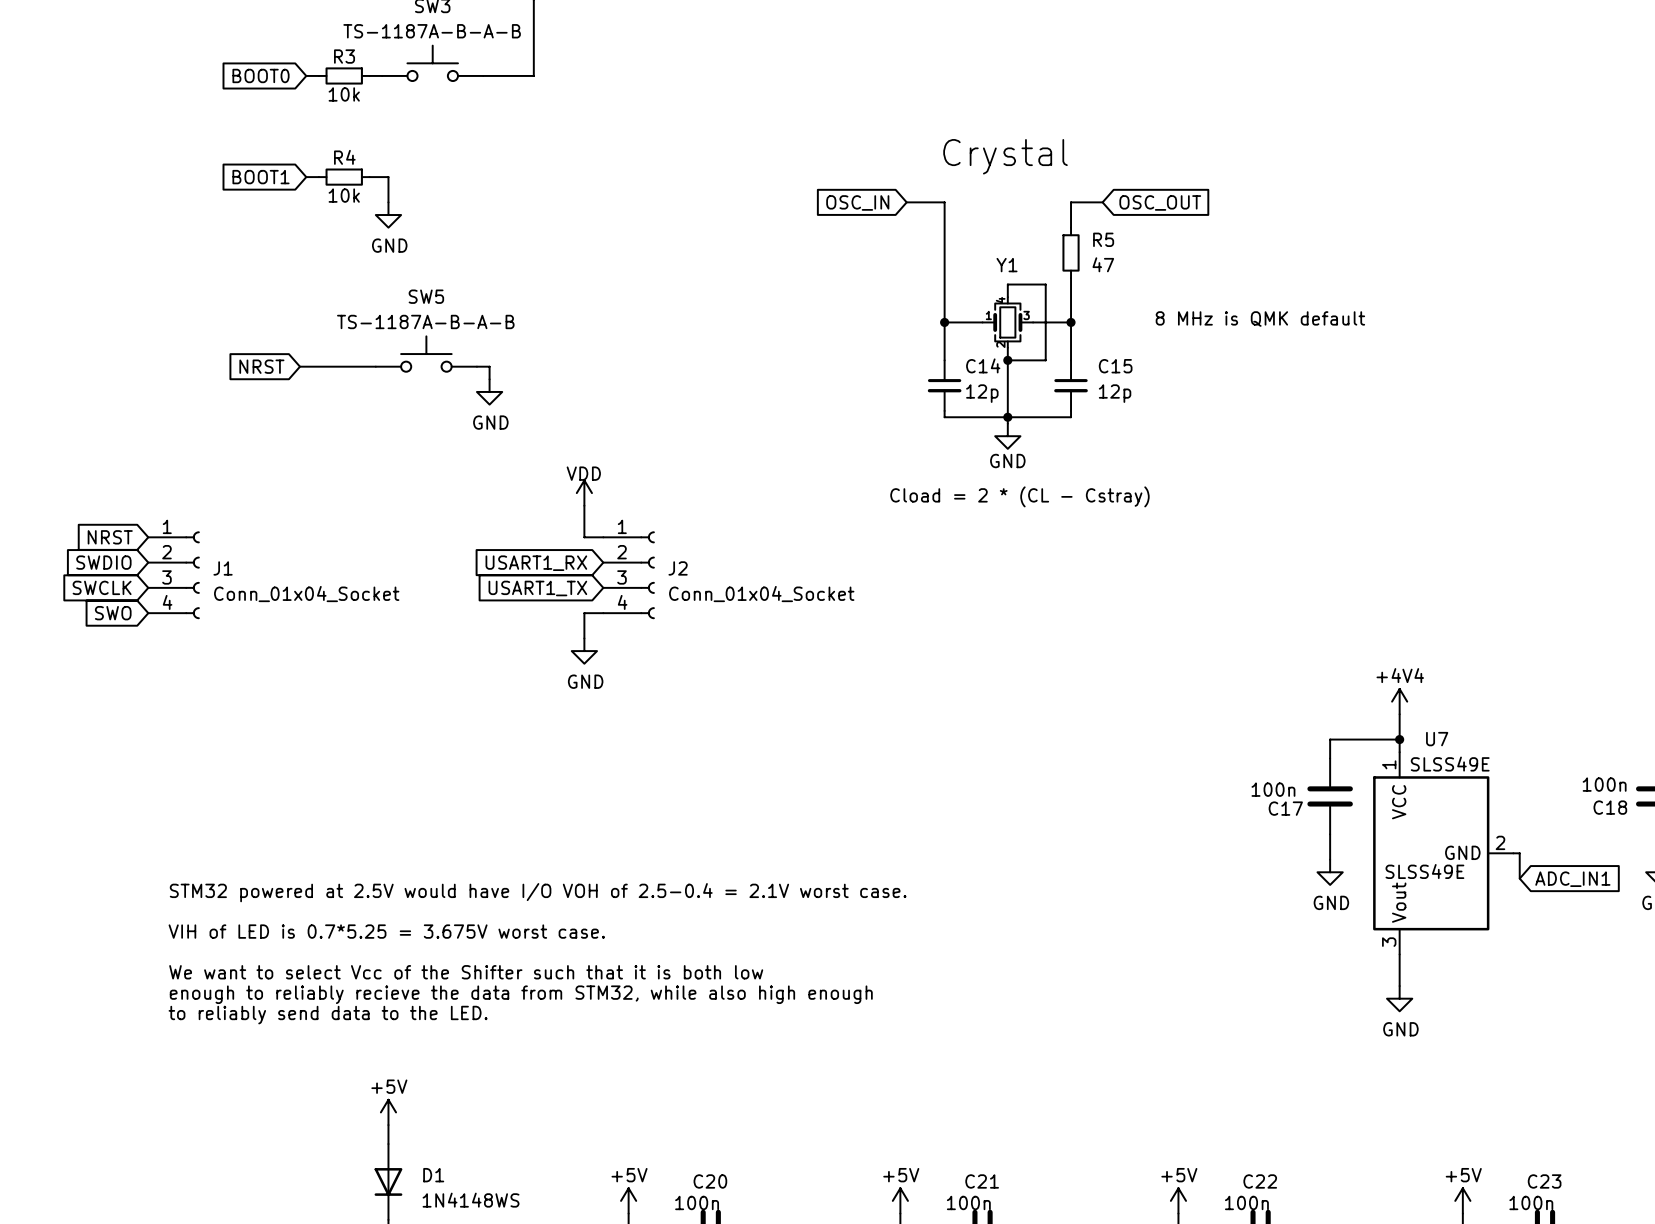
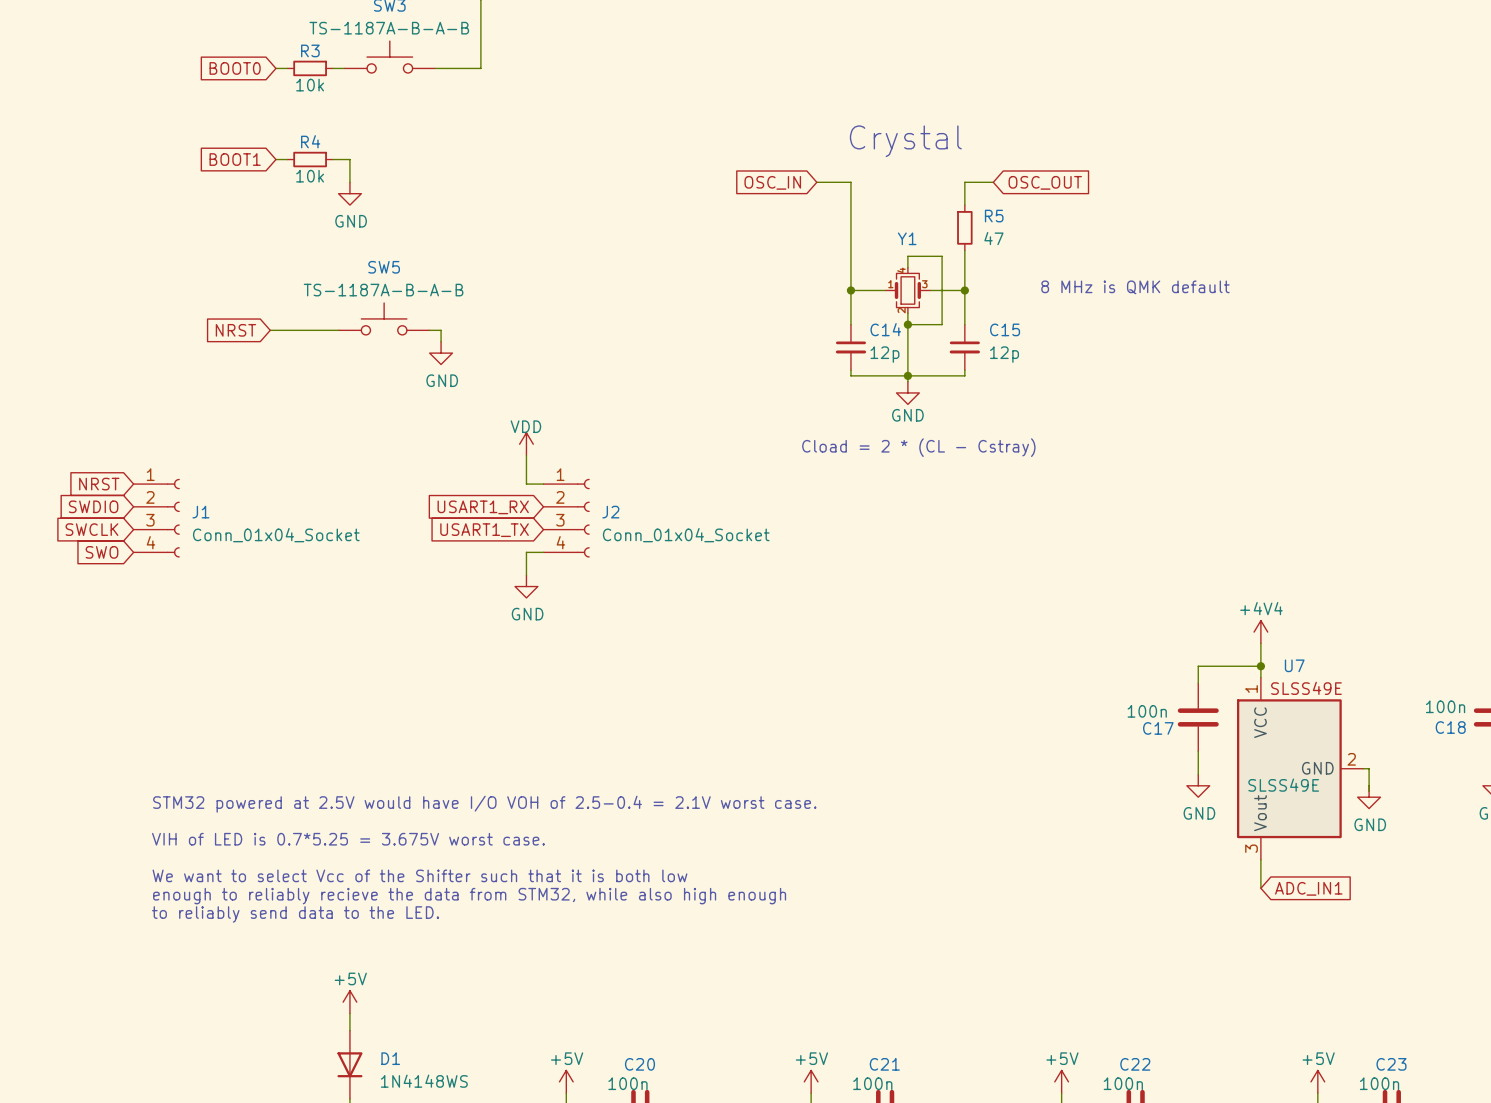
global label position: ADC_IN1 (1572, 879) -> ADC_IN1 (1308, 888)
power symbol position: GND (1399, 998) -> GND (1369, 797)

